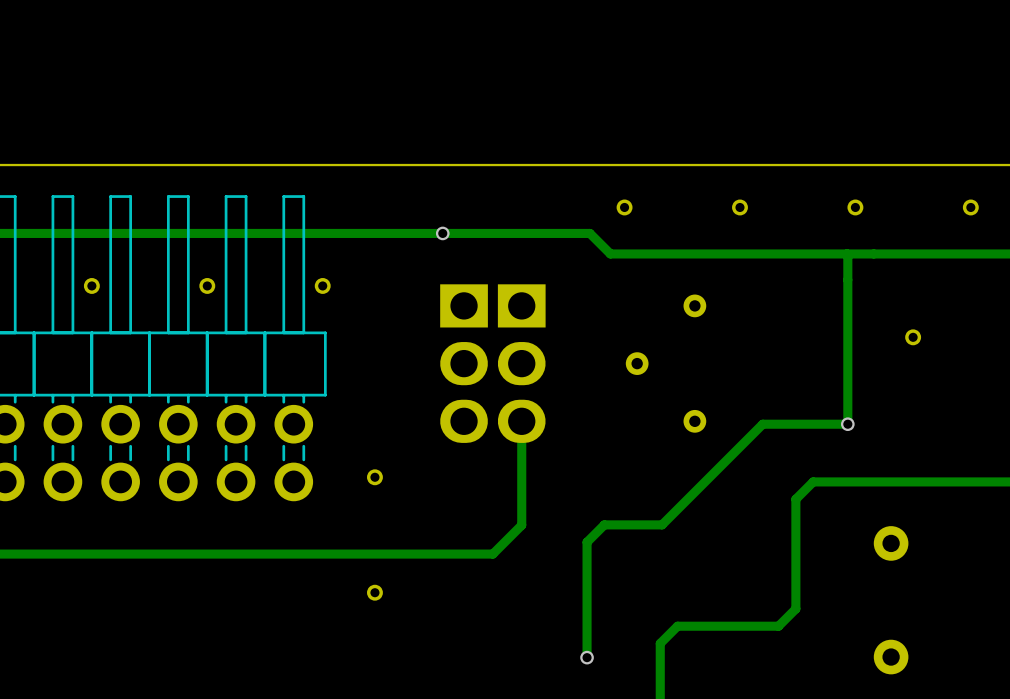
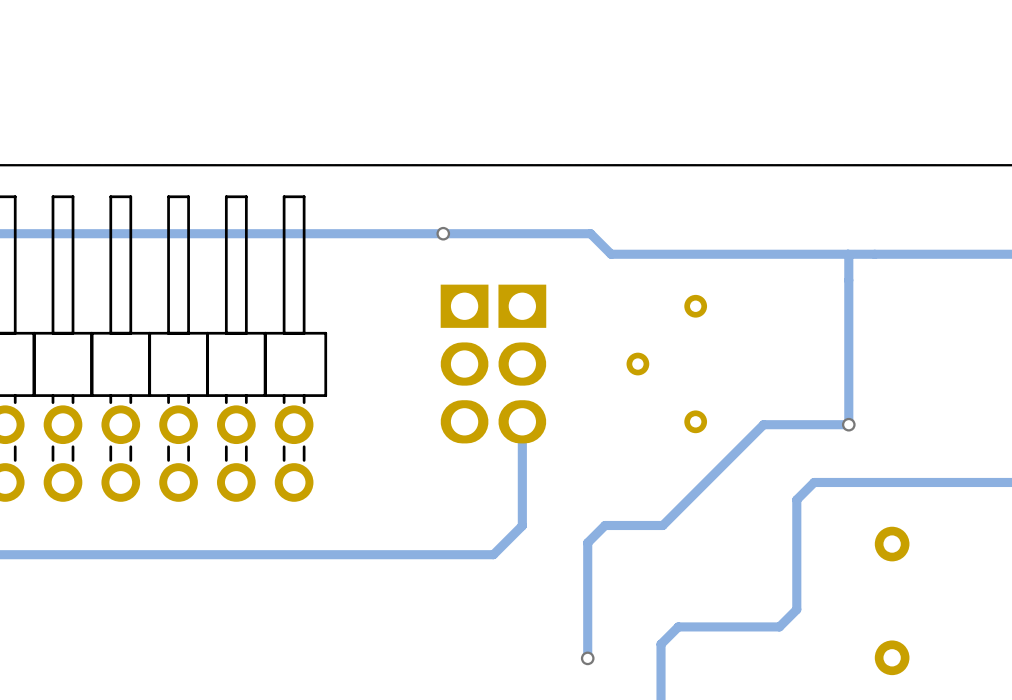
part: (624, 207) -> none
part: (739, 207) -> none
part: (855, 207) -> none
part: (970, 207) -> none
part: (91, 285) -> none
part: (207, 285) -> none
part: (322, 285) -> none
part: (913, 337) -> none
part: (374, 477) -> none
part: (374, 592) -> none

